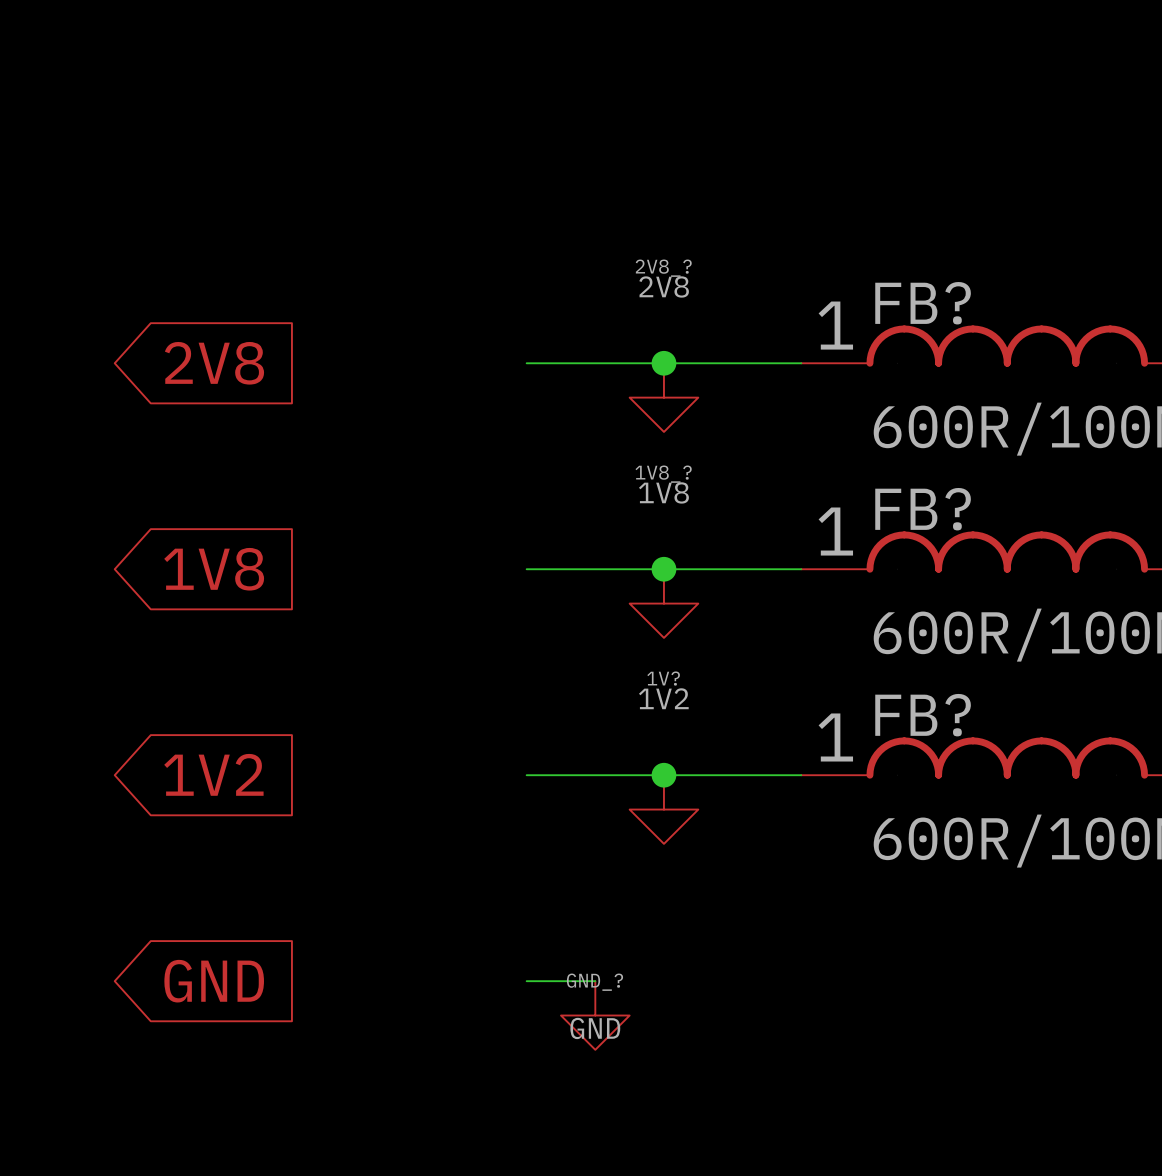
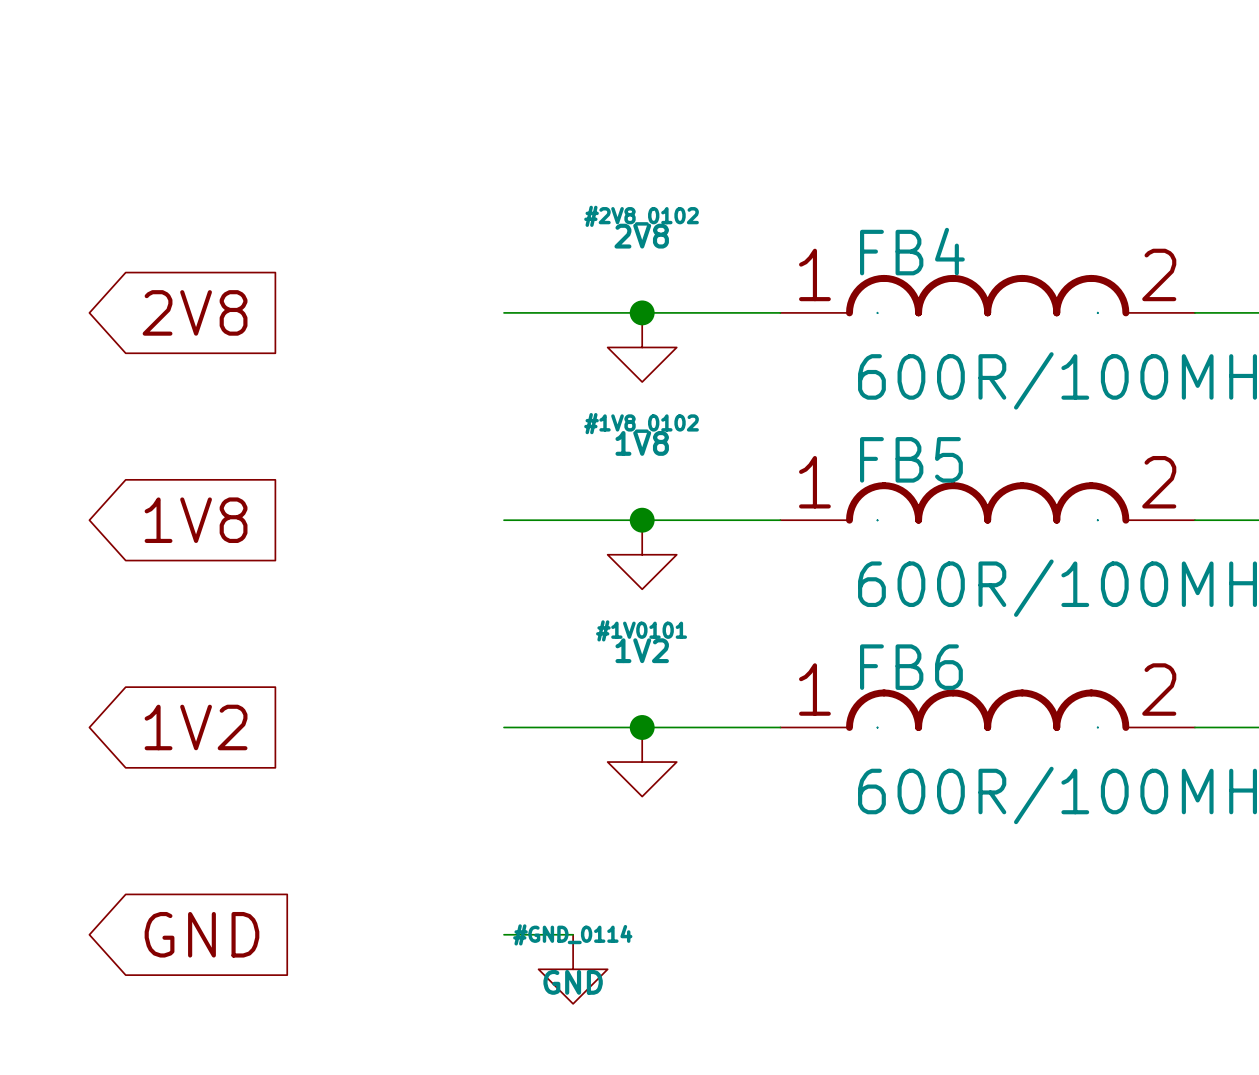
2V8_? name: 2V8_? (663, 268) -> #2V8_0102 (641, 216)
FB? name: FB? (923, 303) -> FB4 (912, 251)
1V8_? name: 1V8_? (663, 474) -> #1V8_0102 (641, 423)
FB? name: FB? (923, 509) -> FB5 (911, 459)
1V? name: 1V? (663, 678) -> #1V0101 (641, 630)
FB? name: FB? (923, 715) -> FB6 (911, 667)
GND_? name: GND_? (594, 982) -> #GND_0114 (572, 934)

